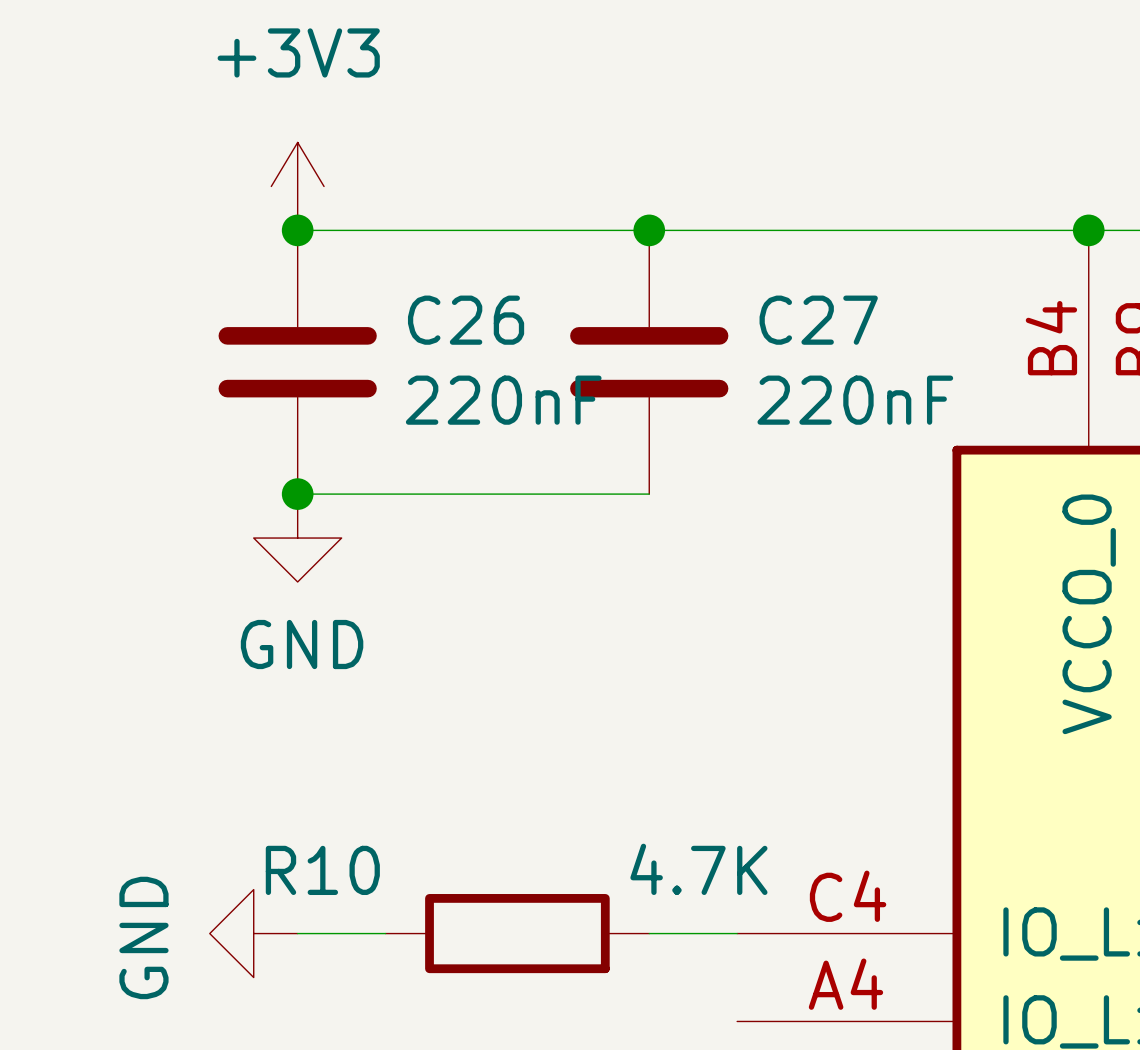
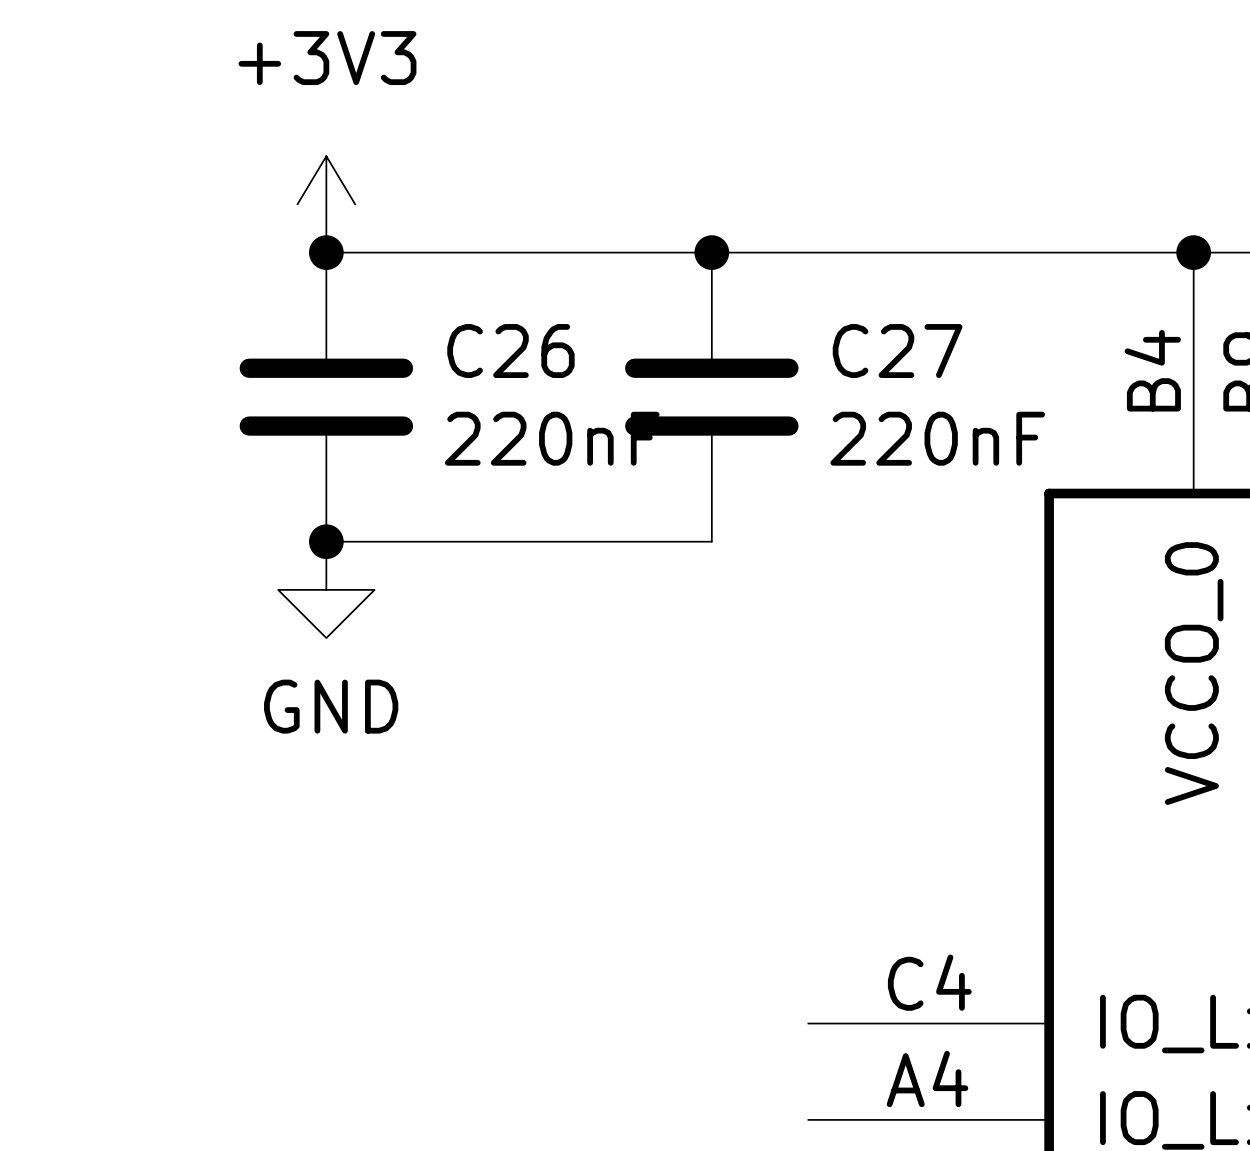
power symbol: GND (253, 933) -> none
wire: (297, 933) (385, 933) -> none
R10: 4.7K (517, 933) -> none
wire: (649, 933) (737, 933) -> none

